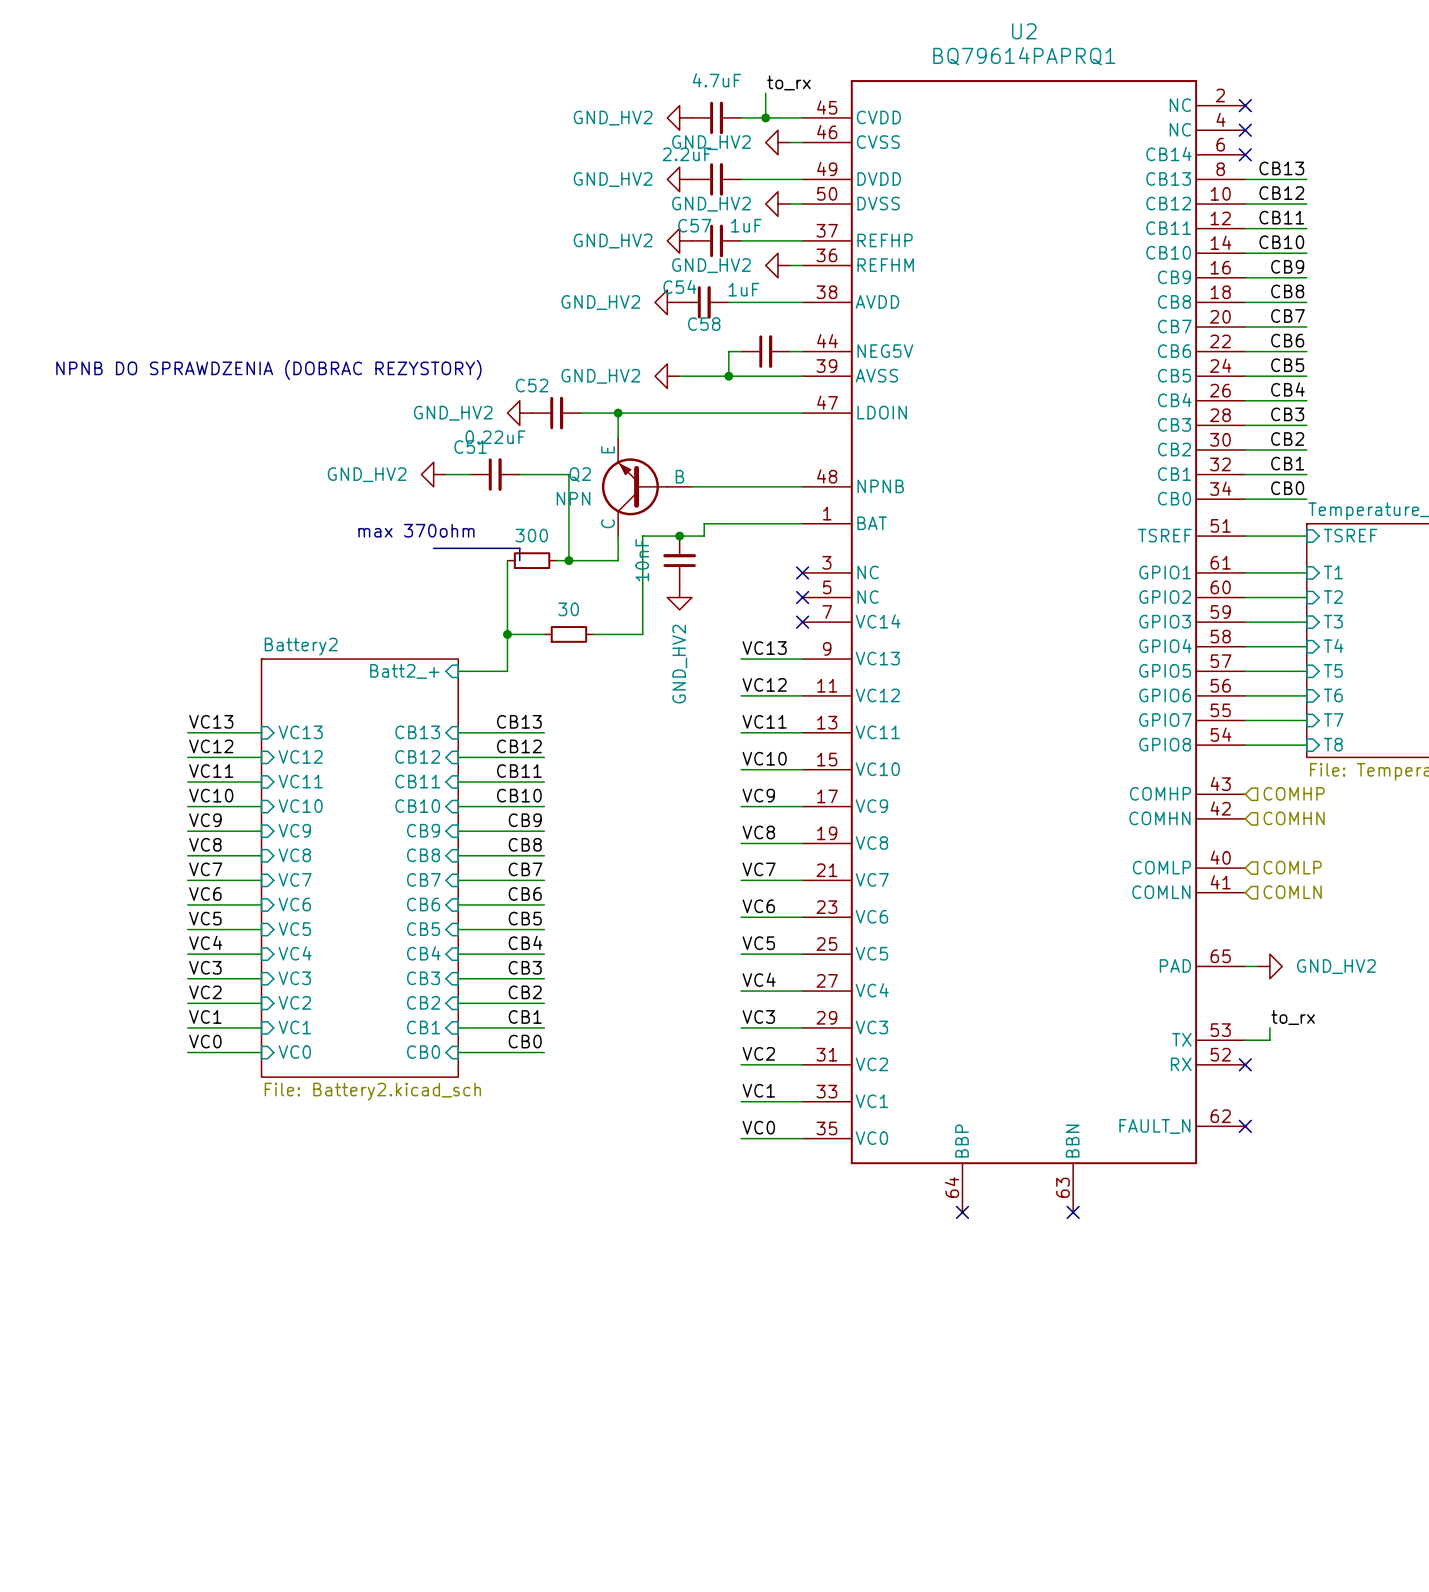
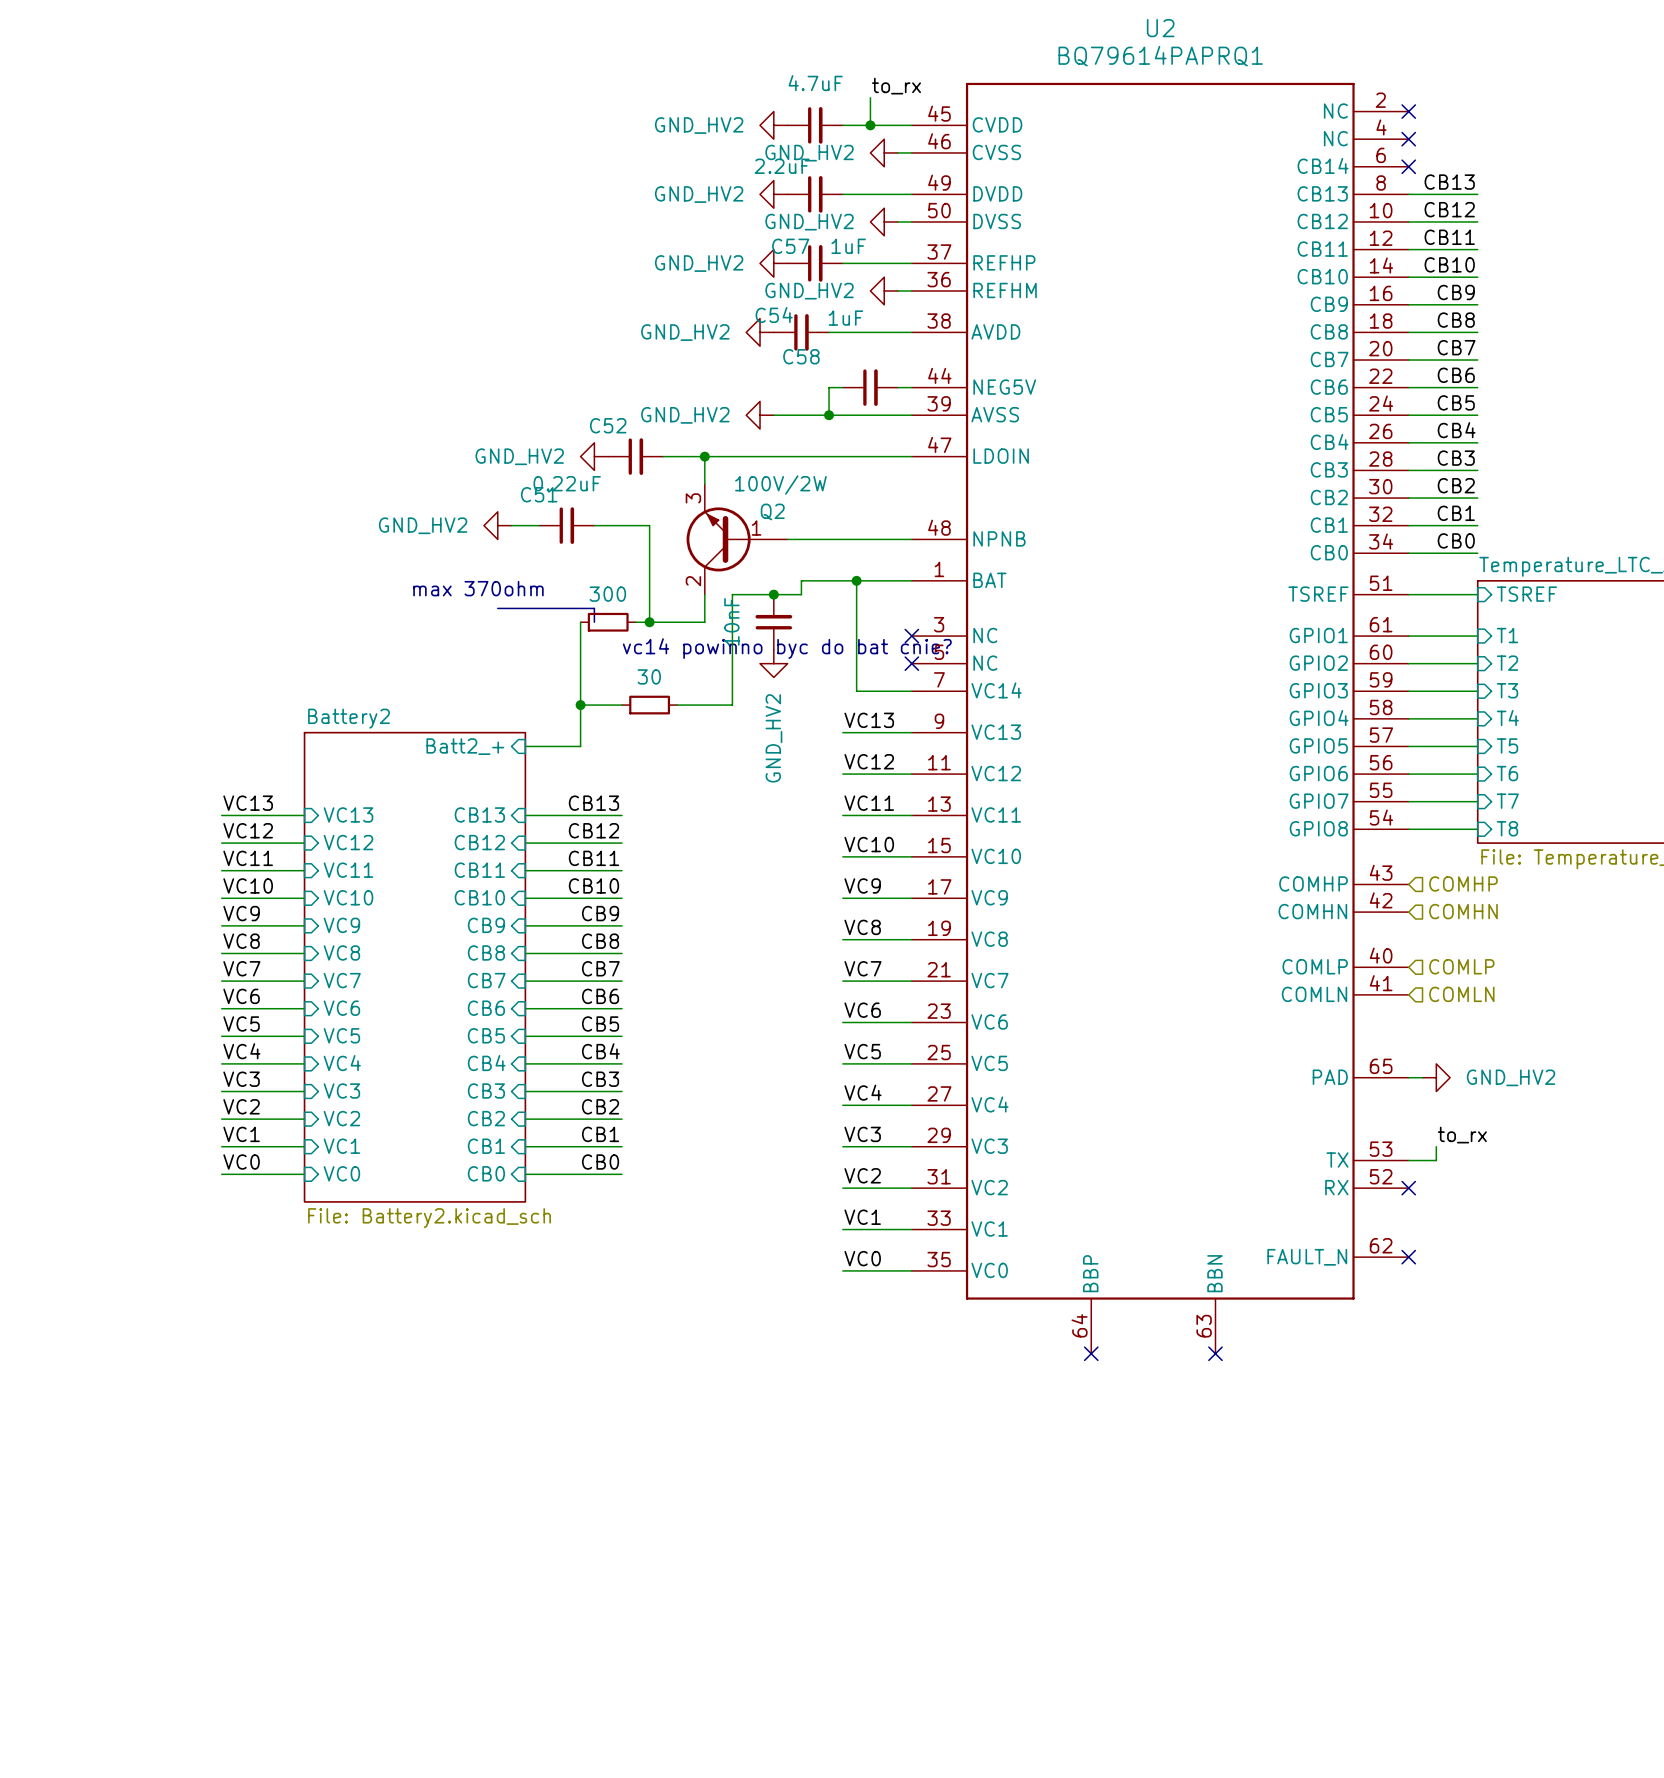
text: NPNB DO SPRAWDZENIA (DOBRAC REZYSTORY) (268, 369) -> none
Q2 symbol: [601, 437, 692, 537] -> [686, 484, 788, 595]
Q2 name position: Q2 (580, 474) -> Q2 (772, 511)
Q2 value: NPN (573, 498) -> 100V/2W (780, 485)
wire: none -> (856, 580) (856, 691) (911, 691)
junction: none -> (856, 580)
text: none -> vc14 powinno byc do bat cnie? (787, 648)
no-connect mark: (802, 622) -> none

